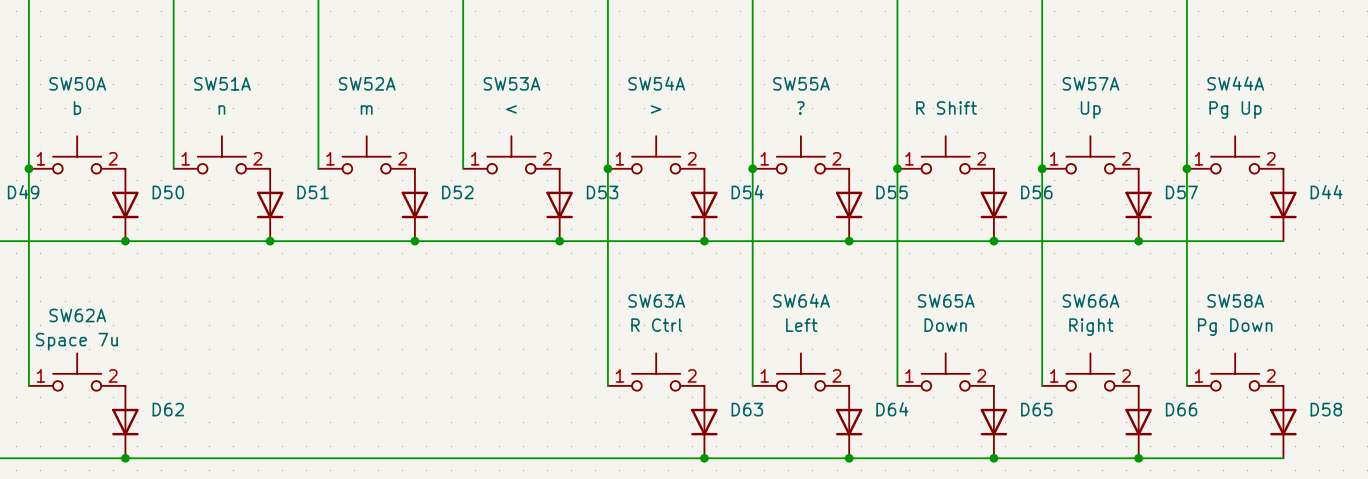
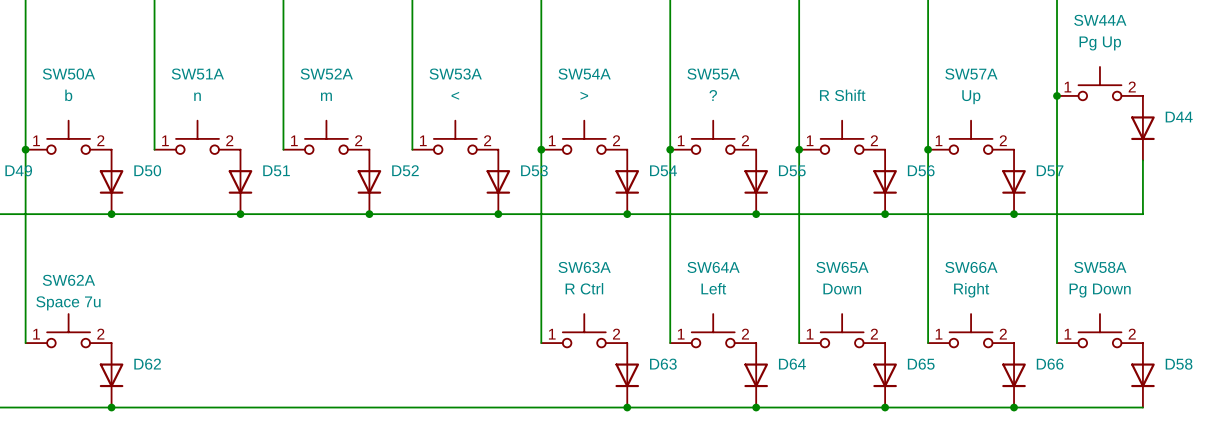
junction: none -> (1057, 95)
SW44A position: (1235, 154) -> (1099, 83)
junction: (1186, 168) -> none
D44 position: (1283, 204) -> (1142, 128)

